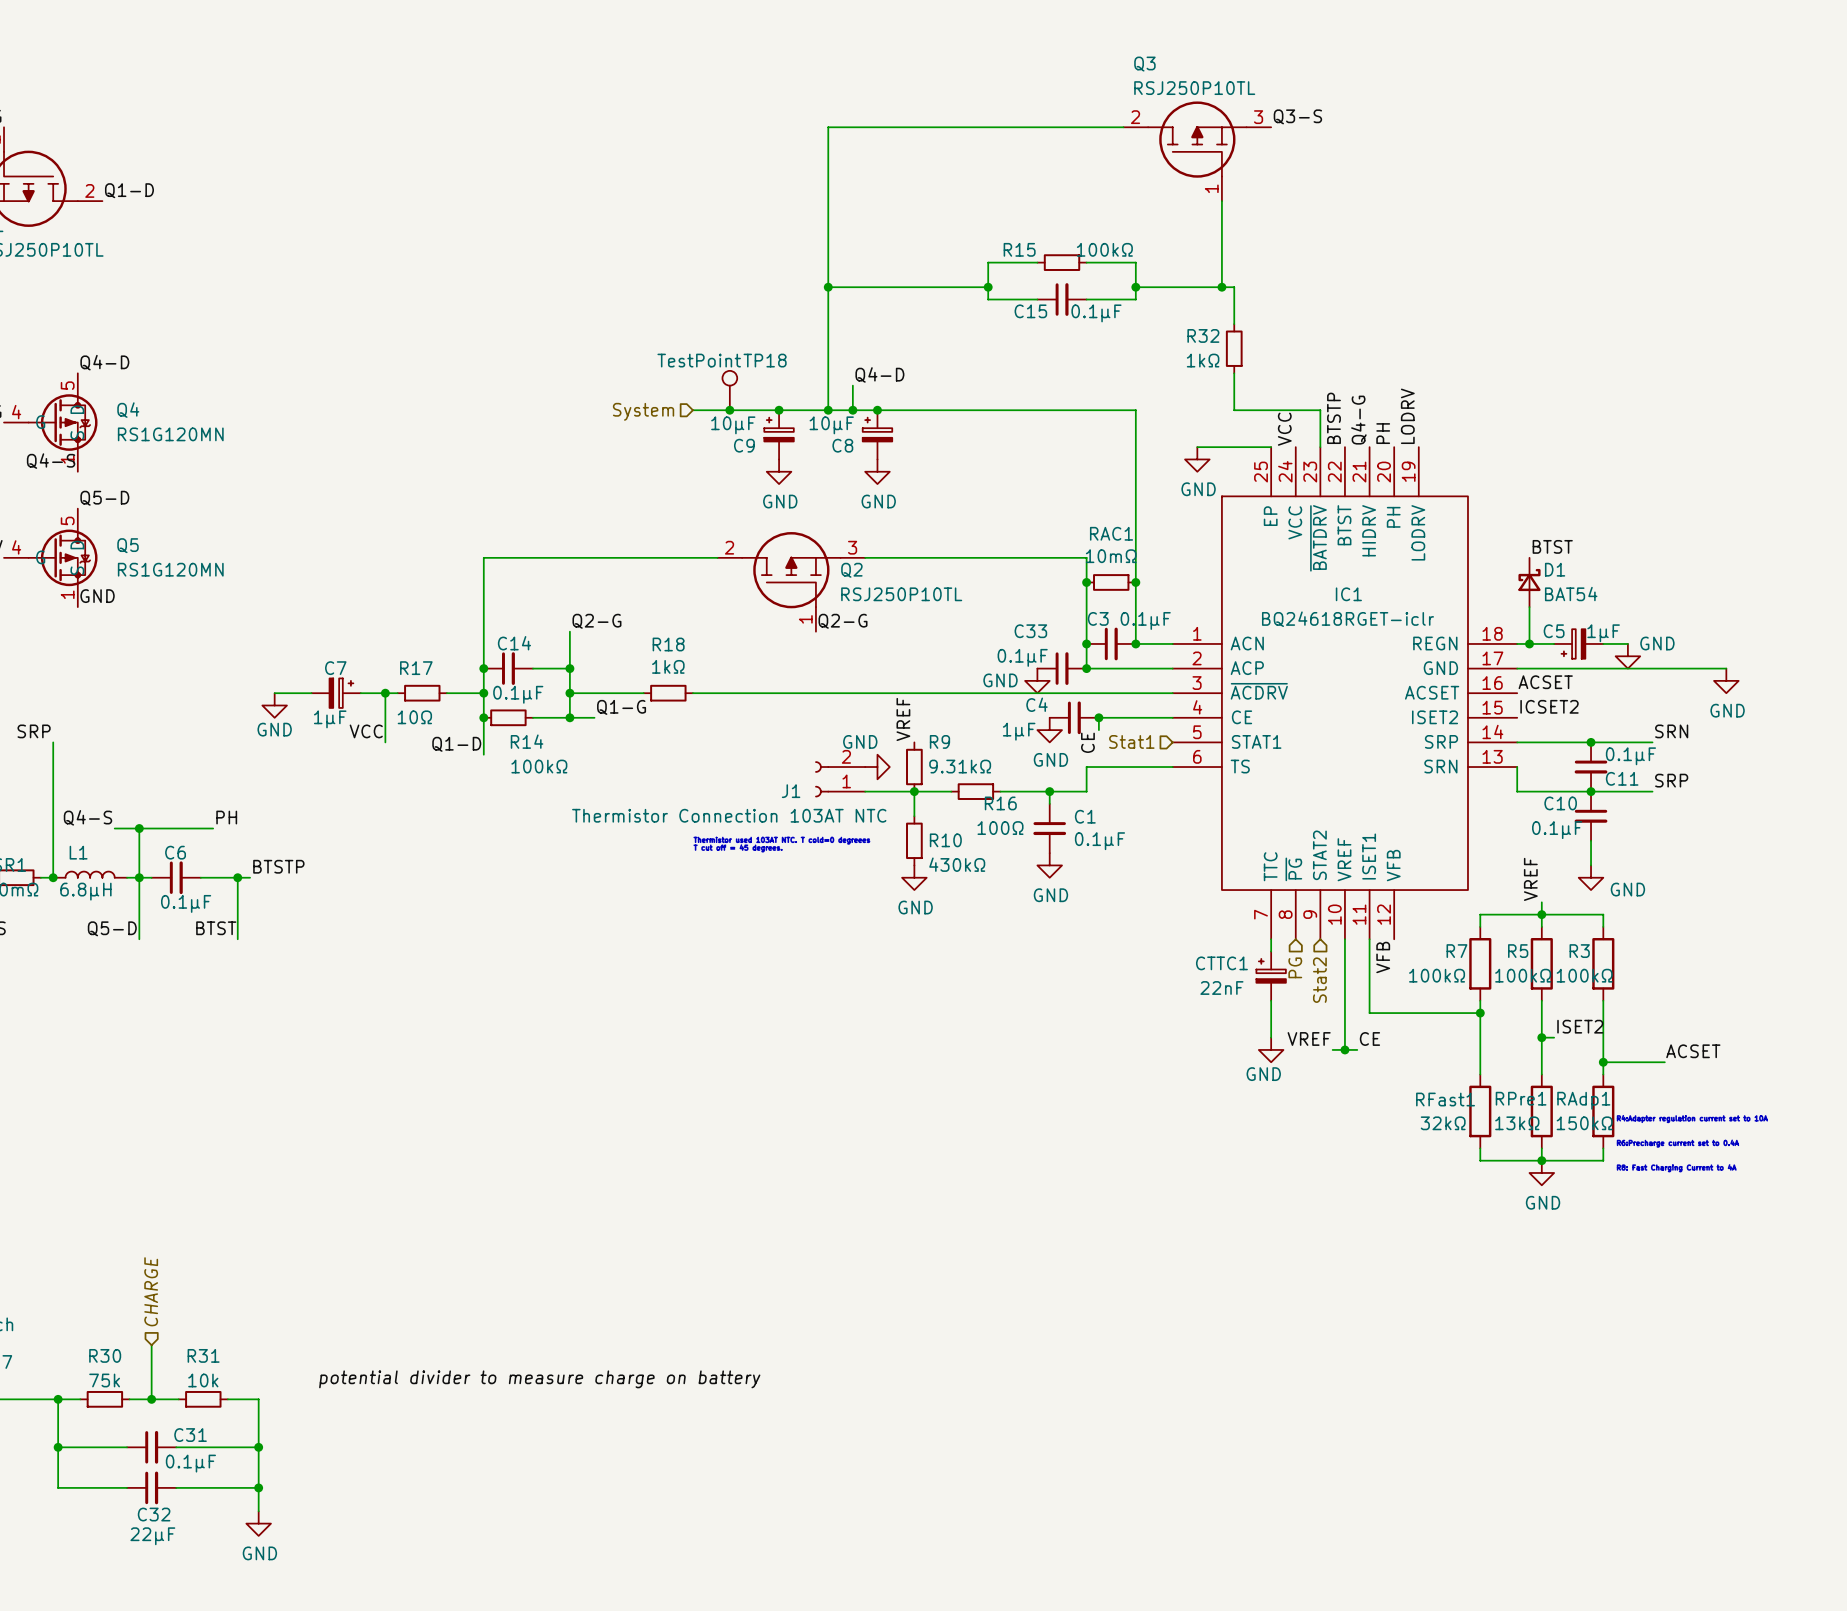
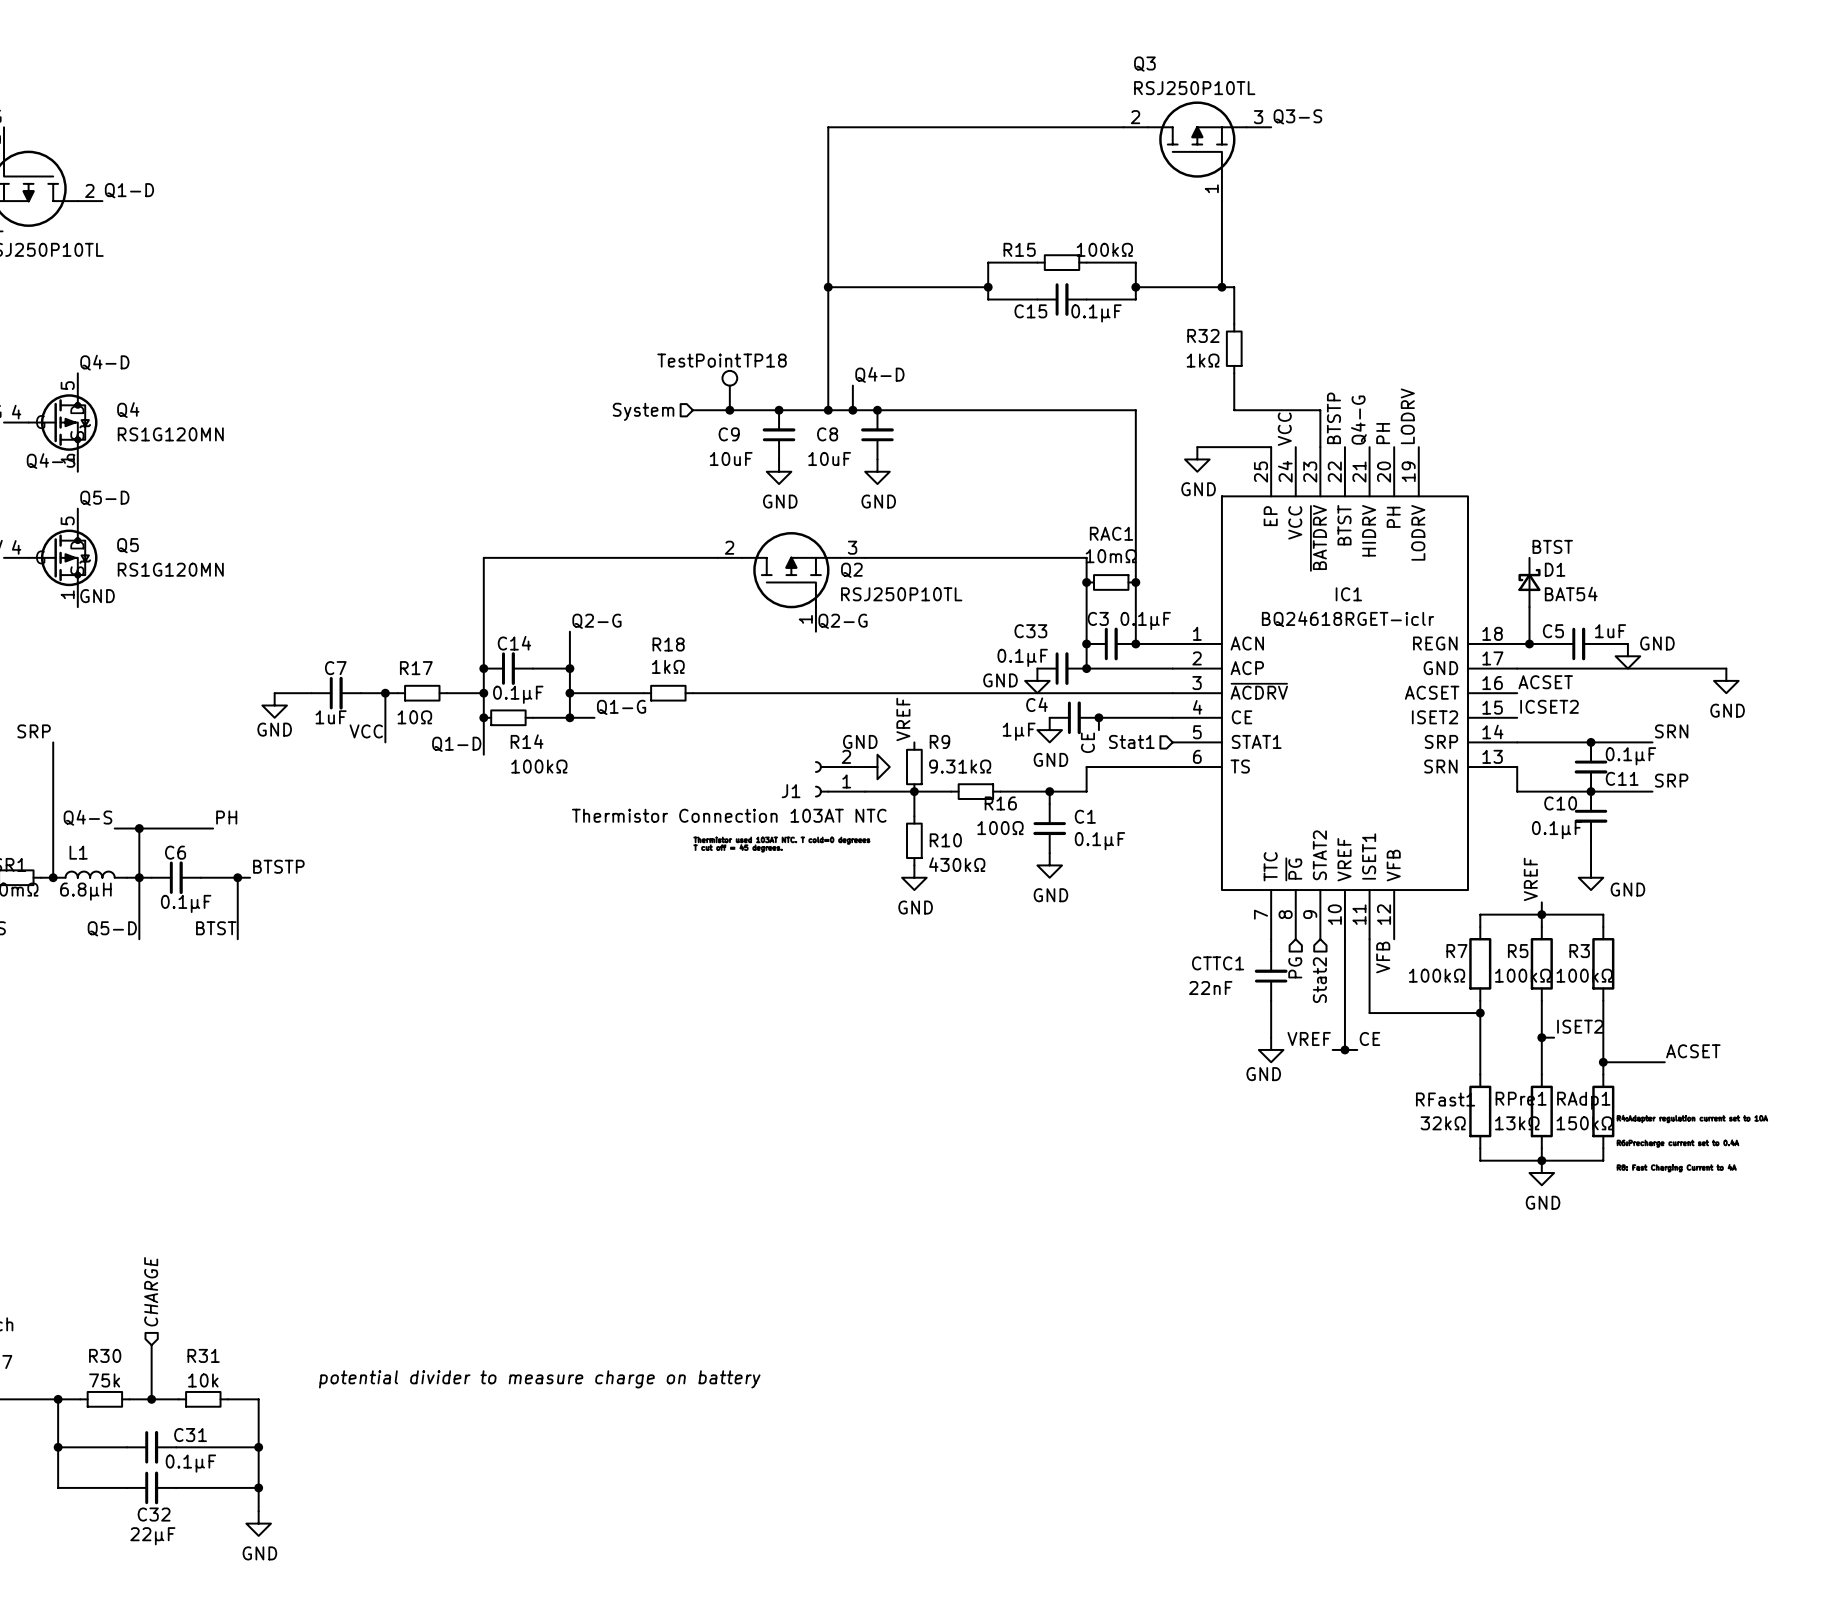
C9 symbol: [764, 410, 794, 460] -> [762, 410, 796, 460]
C8 symbol: [862, 410, 893, 460] -> [861, 410, 894, 460]
C9 value: 10μF (733, 425) -> 10uF (731, 458)
C8 value: 10μF (831, 425) -> 10uF (829, 458)
C5 symbol: [1554, 629, 1604, 659] -> [1554, 627, 1604, 661]
C5 value: 1μF (1603, 633) -> 1uF (1610, 631)
C7 symbol: [311, 678, 361, 708] -> [311, 676, 361, 710]
C7 value: 1µF (330, 719) -> 1uF (331, 717)
CTTC1 symbol: [1256, 951, 1286, 1001] -> [1254, 951, 1288, 1001]

